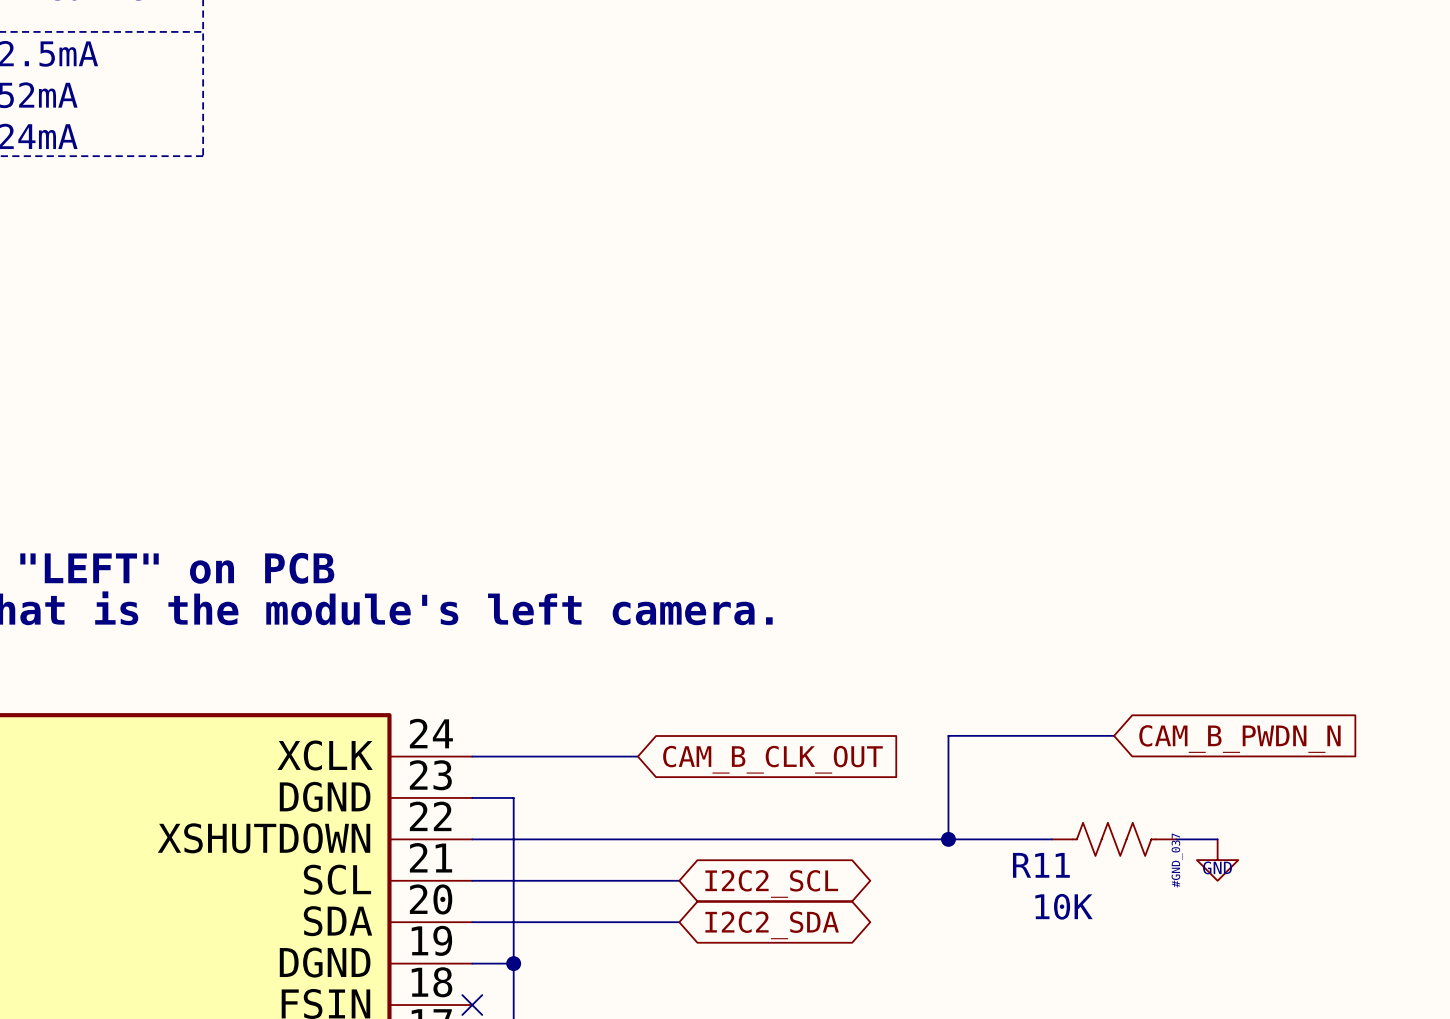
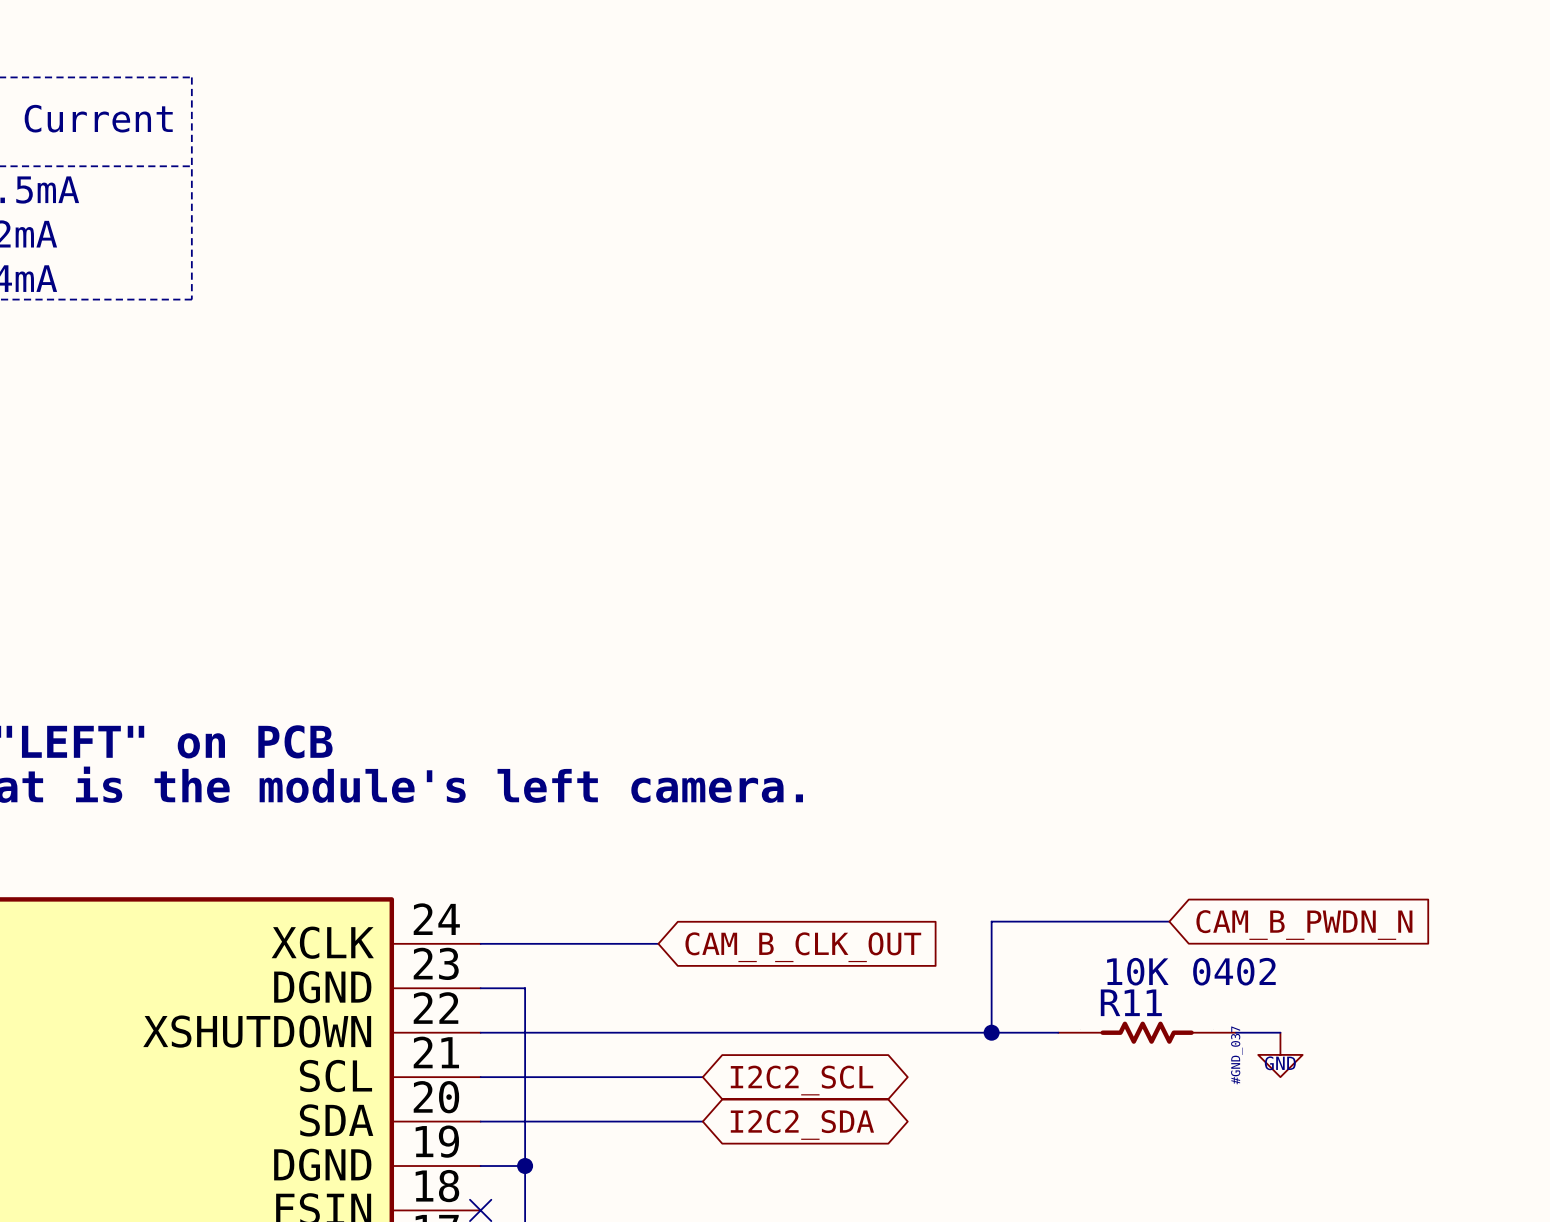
R11 symbol: [1051, 822, 1177, 856] -> [1058, 1021, 1237, 1044]
R11 name position: R11 (1041, 865) -> R11 (1131, 1002)
R11 value: 10K (1064, 906) -> 10K 0402 (1191, 971)

